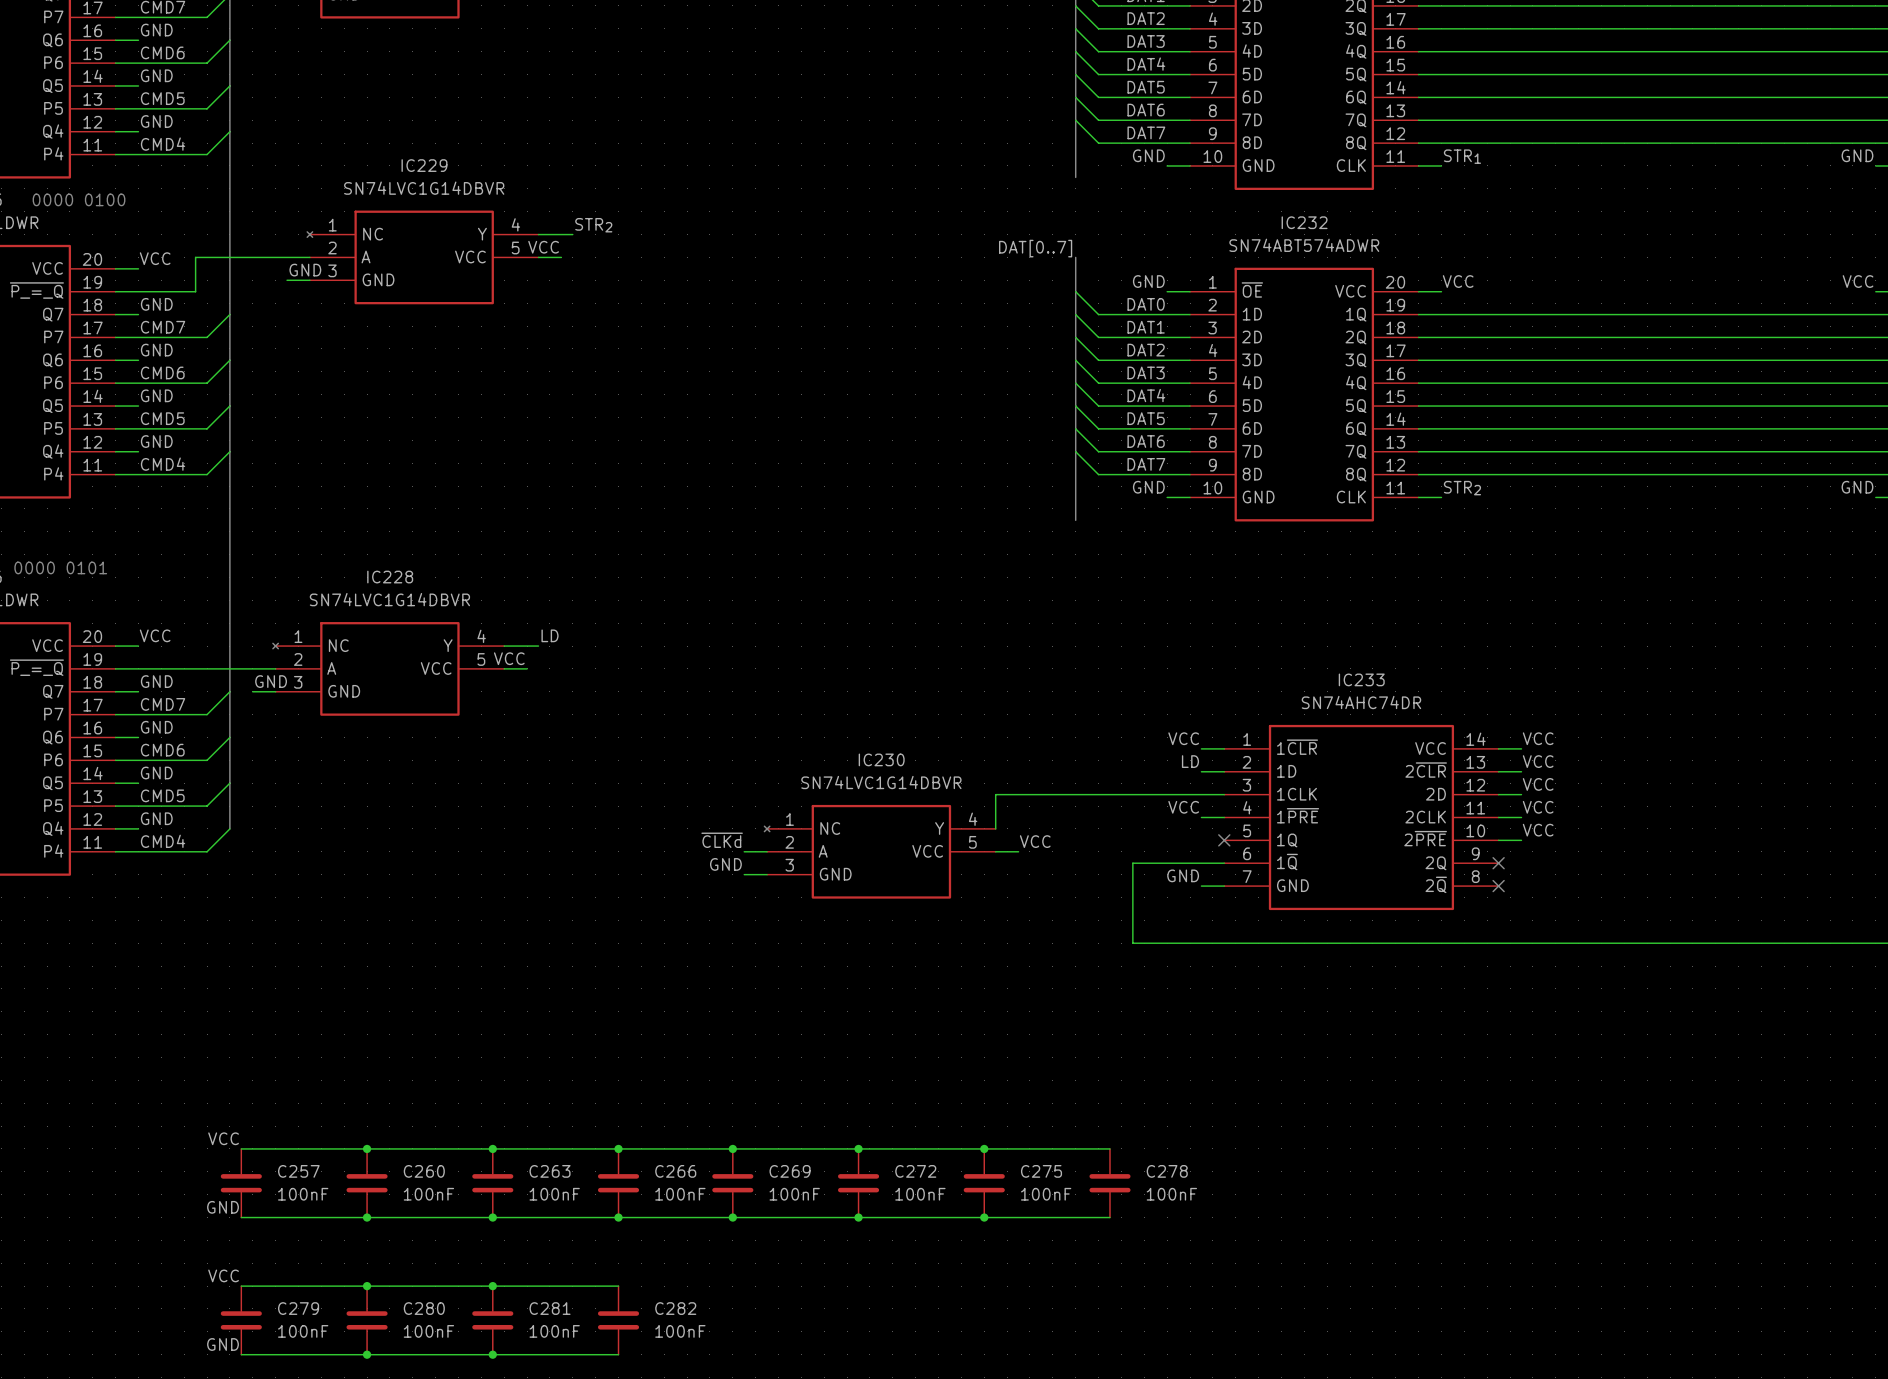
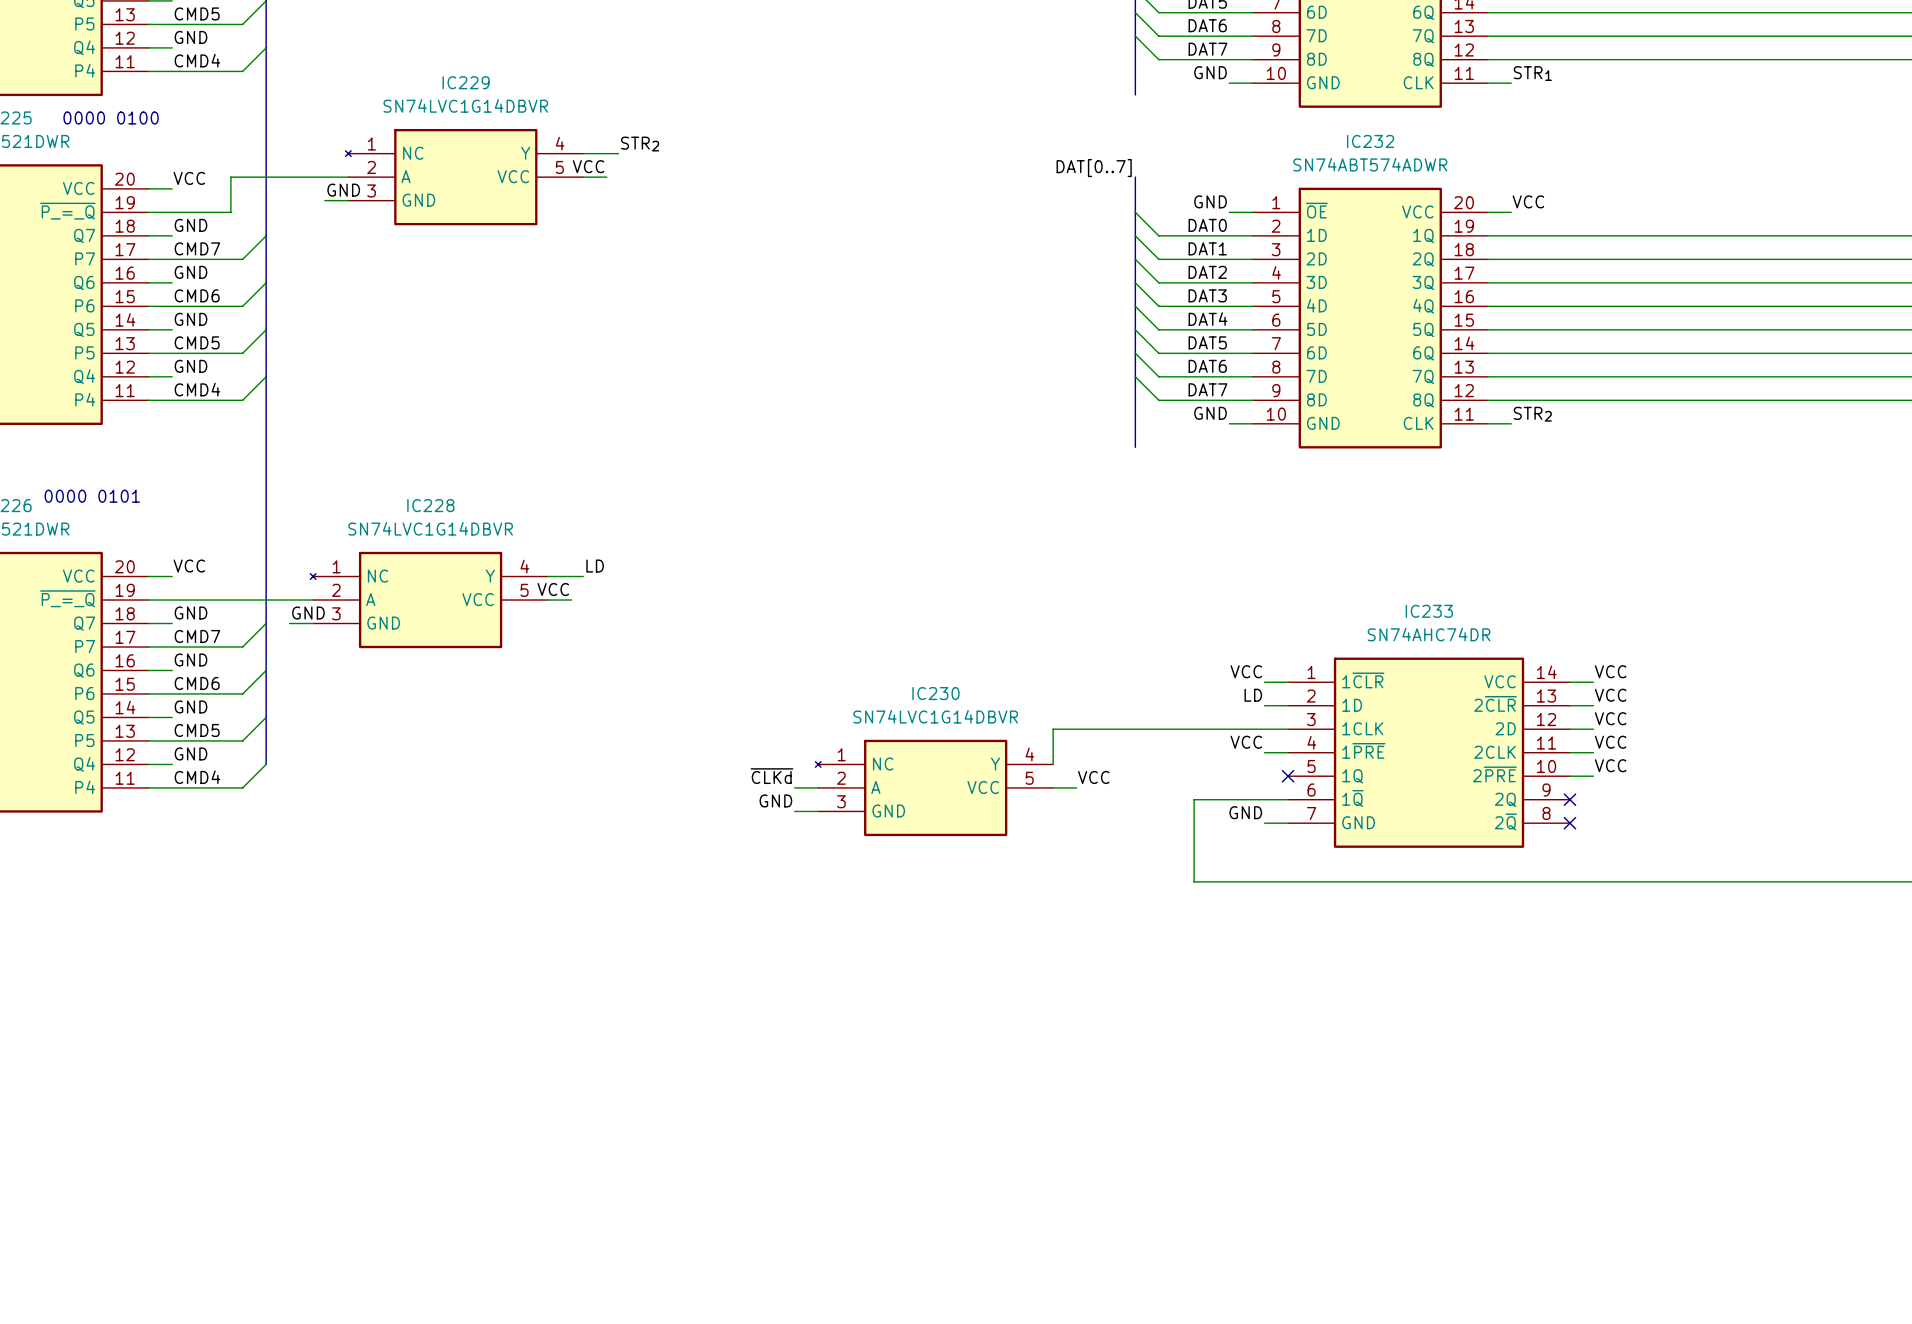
label: VCC (223, 1138) -> none
wire: (241, 1148) (1110, 1148) -> none
junction: (367, 1148) -> none
junction: (492, 1148) -> none
junction: (618, 1148) -> none
junction: (732, 1148) -> none
junction: (858, 1148) -> none
junction: (984, 1148) -> none
C257: 100nF (241, 1183) -> none
C260: 100nF (367, 1183) -> none
C263: 100nF (492, 1183) -> none
C266: 100nF (618, 1183) -> none
C269: 100nF (732, 1183) -> none
C272: 100nF (858, 1183) -> none
C275: 100nF (984, 1183) -> none
C278: 100nF (1110, 1183) -> none
label: GND (223, 1207) -> none
wire: (241, 1217) (1110, 1217) -> none
junction: (367, 1217) -> none
junction: (492, 1217) -> none
junction: (618, 1217) -> none
junction: (732, 1217) -> none
junction: (858, 1217) -> none
junction: (984, 1217) -> none
label: VCC (223, 1275) -> none
wire: (241, 1286) (618, 1286) -> none
junction: (367, 1286) -> none
junction: (492, 1286) -> none
C279: 100nF (241, 1320) -> none
C280: 100nF (367, 1320) -> none
C281: 100nF (492, 1320) -> none
C282: 100nF (618, 1320) -> none
label: GND (223, 1344) -> none
wire: (241, 1354) (618, 1354) -> none
junction: (367, 1354) -> none
junction: (492, 1354) -> none

